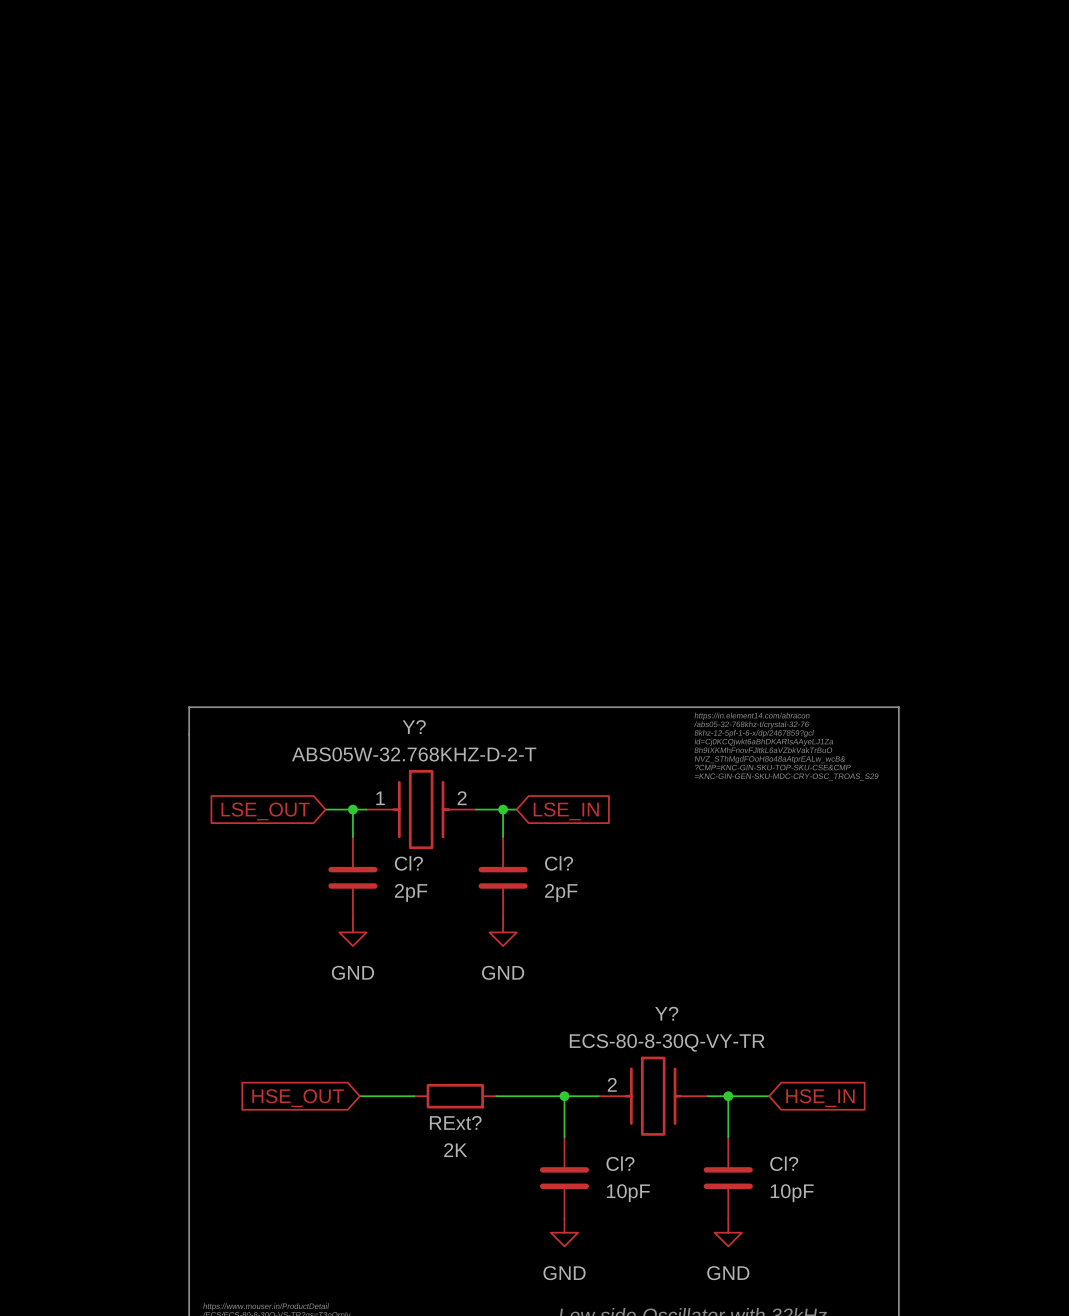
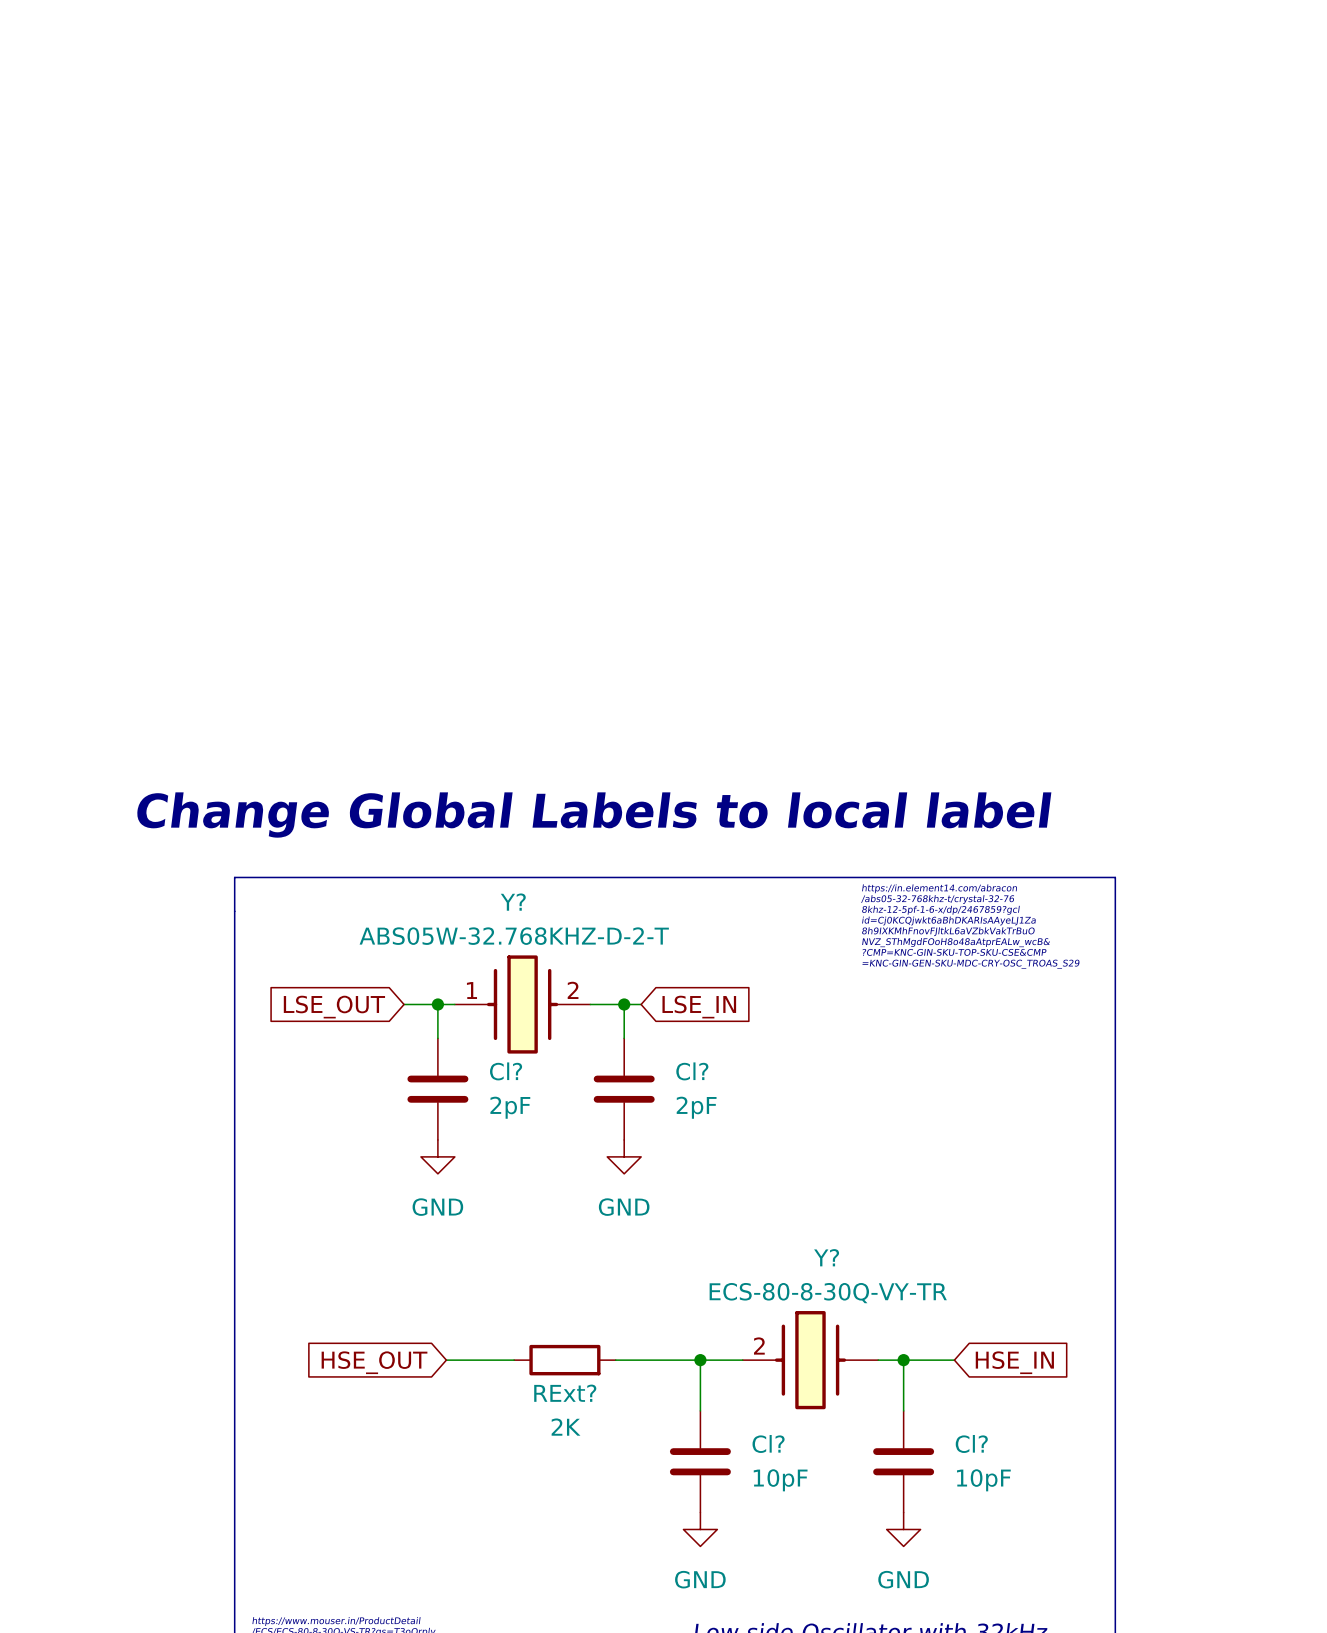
text: none -> Change Global Labels to local label (593, 815)

